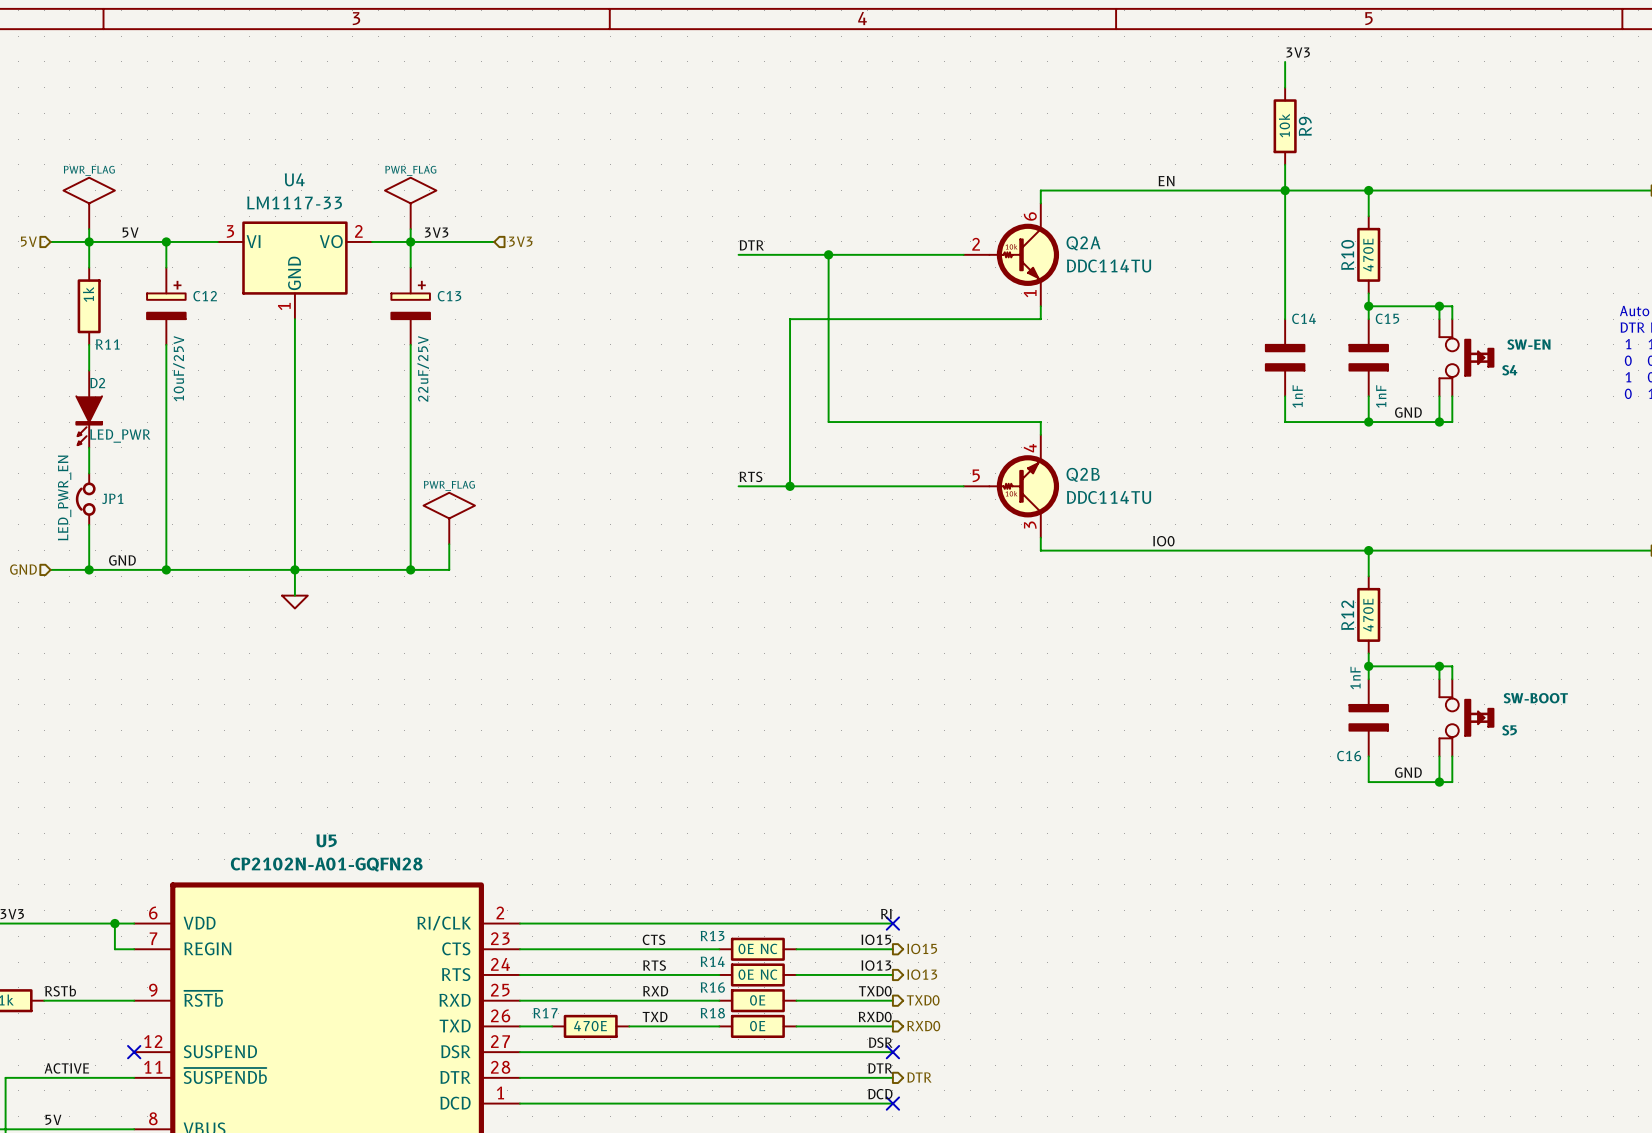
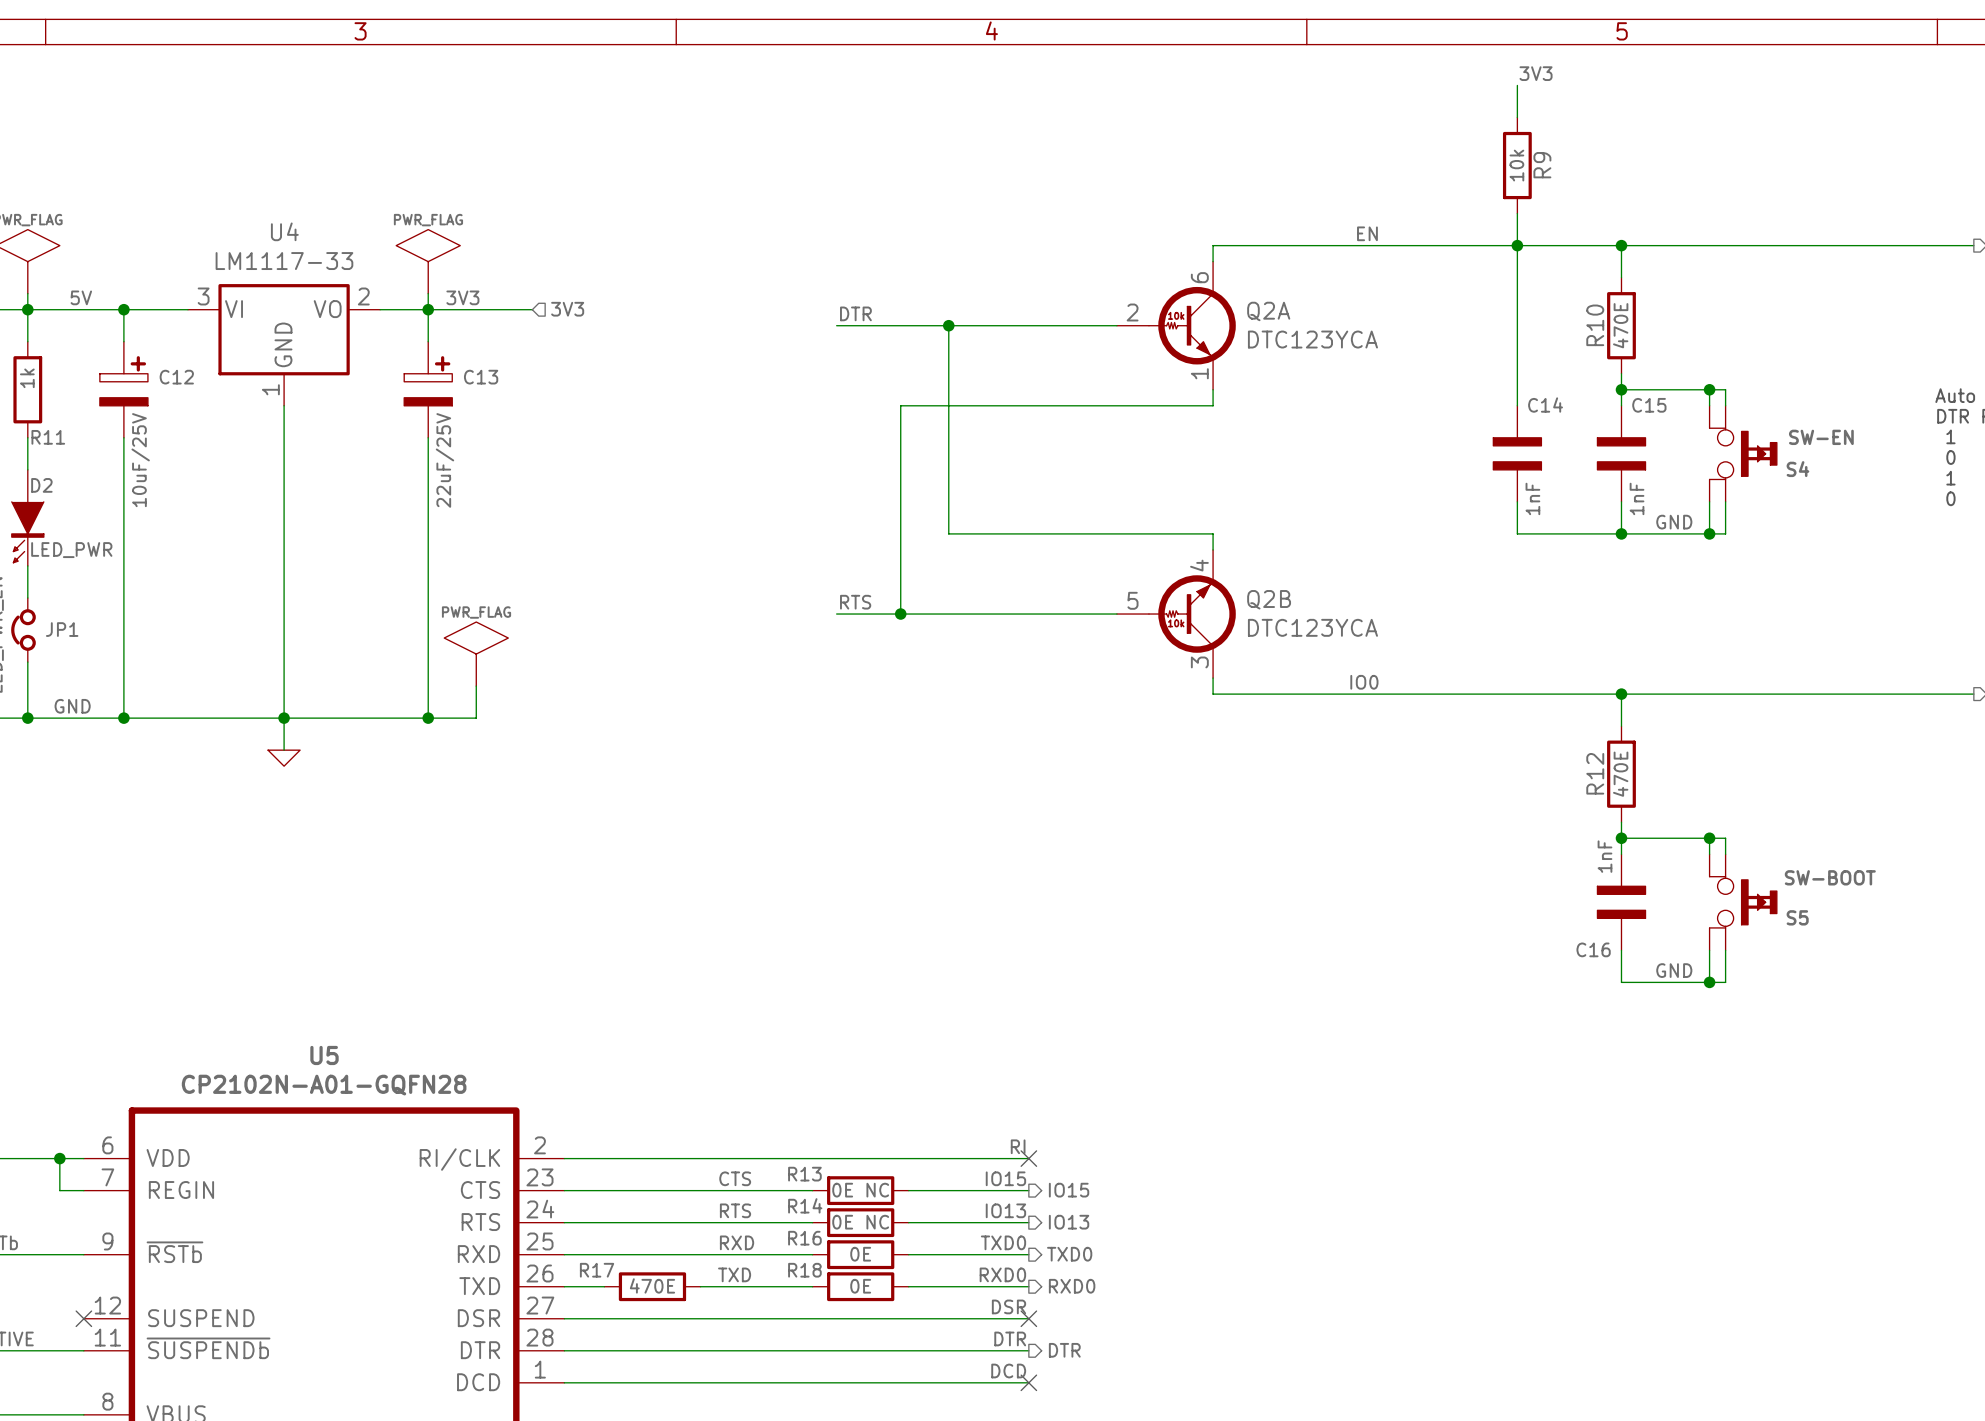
Q2A value: DDC114TU (1109, 266) -> DTC123YCA (1312, 339)
Q2B value: DDC114TU (1109, 497) -> DTC123YCA (1312, 627)

